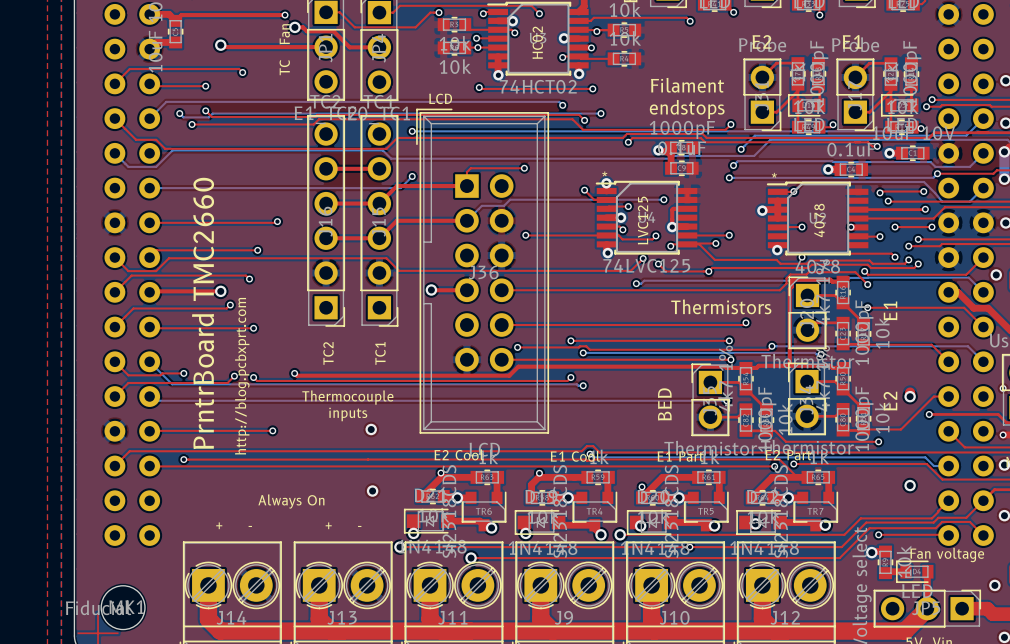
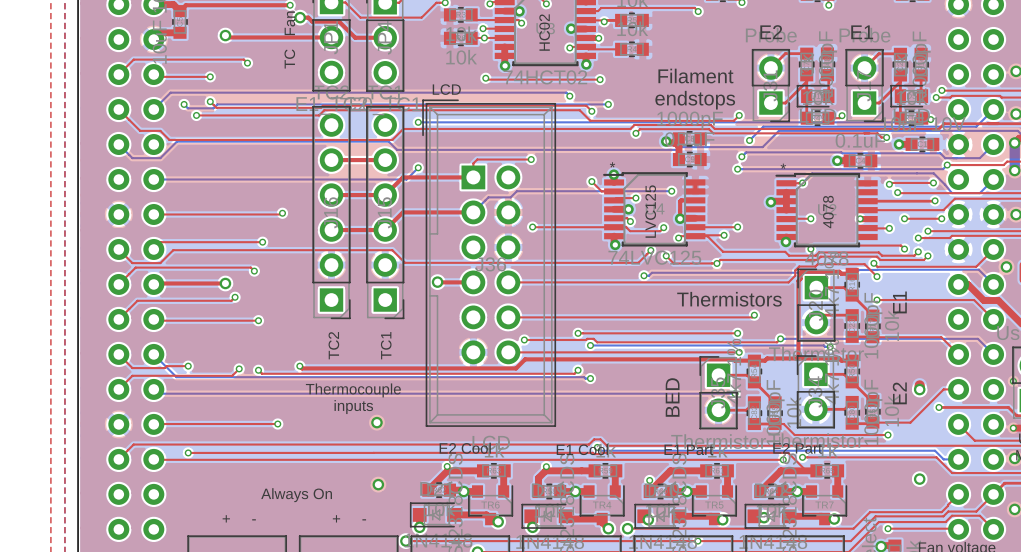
text: PrntrBoard TMC2660 (203, 313) -> none
text: http://blog.pcbxprt.com (242, 376) -> none

